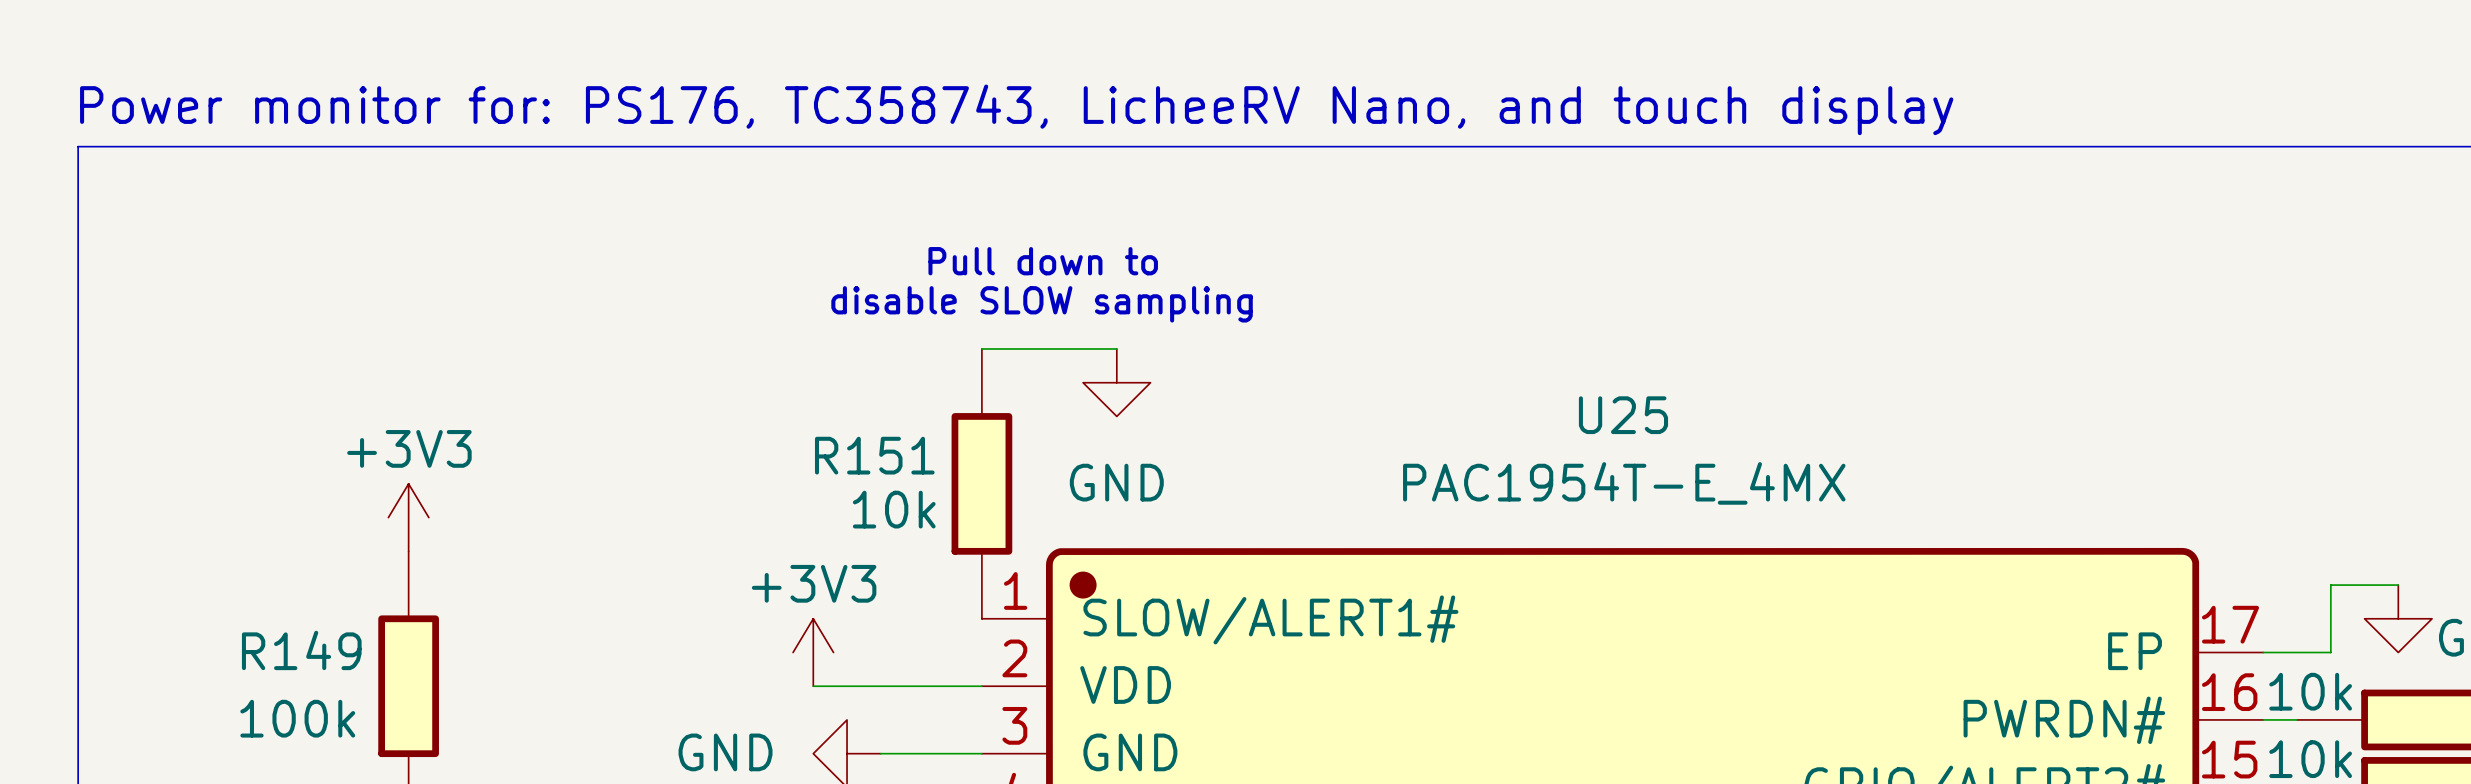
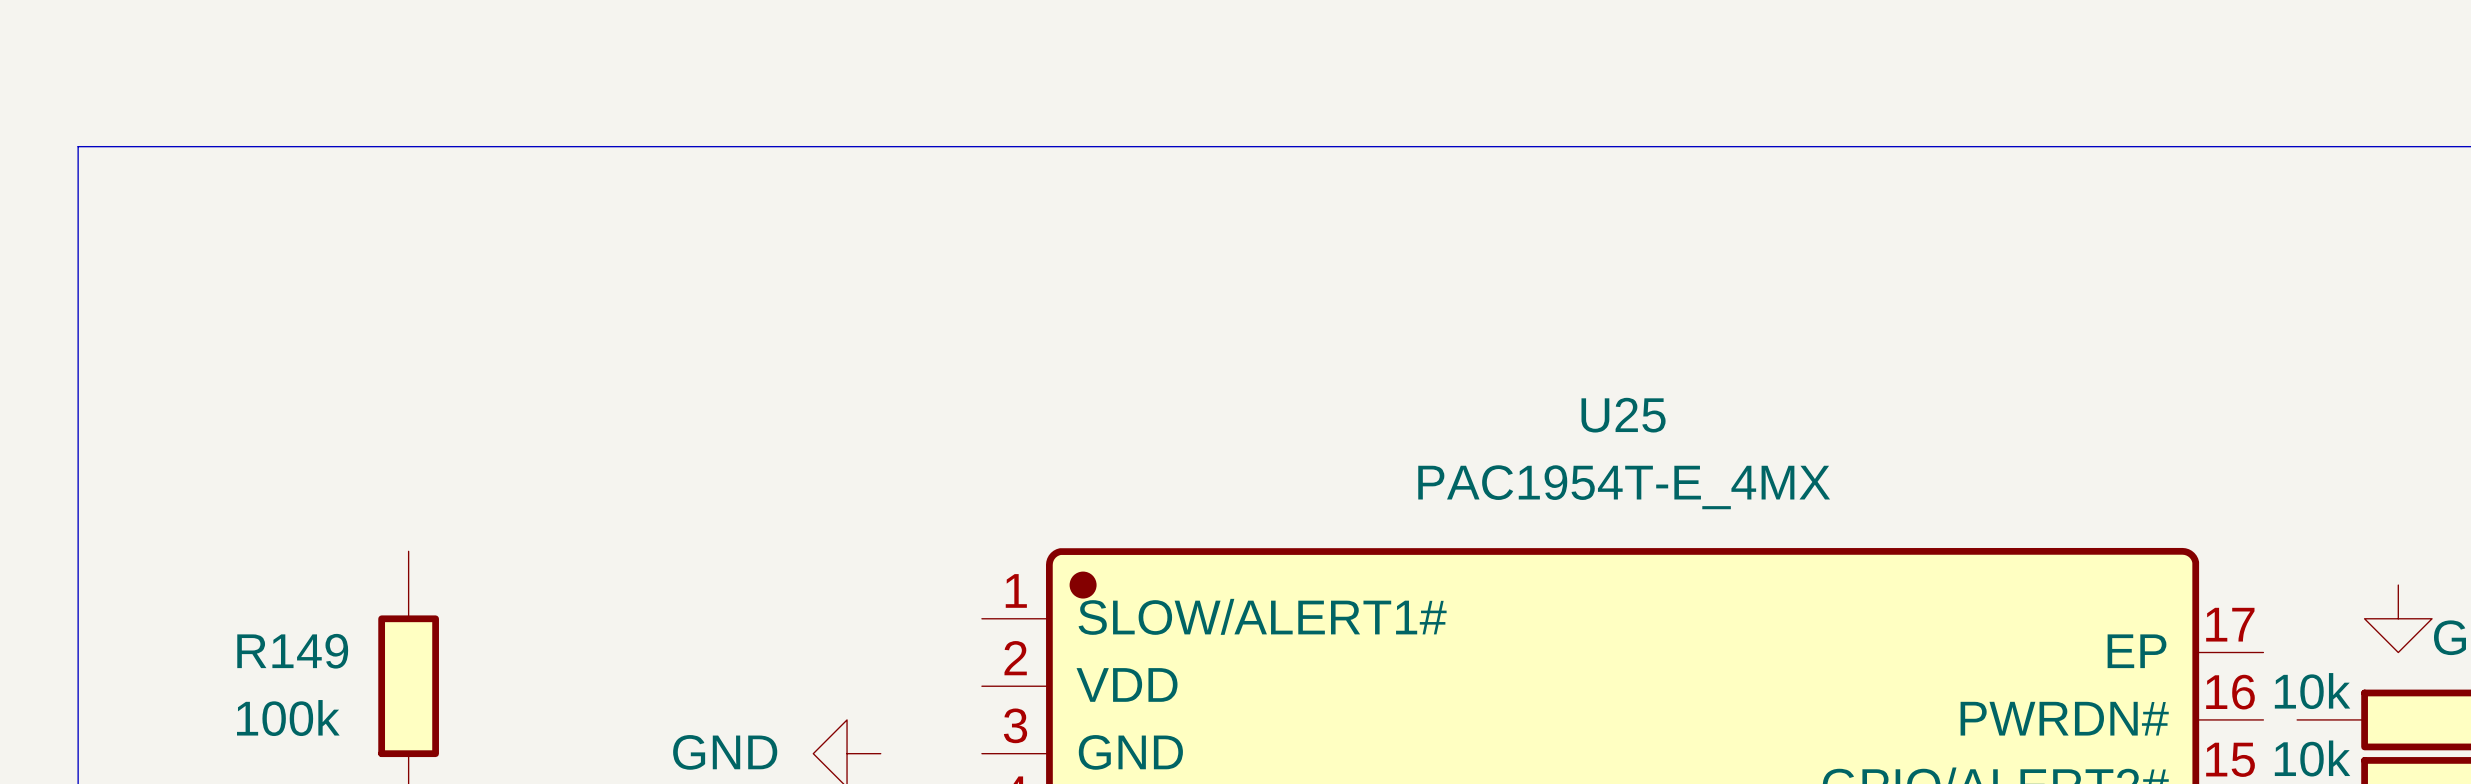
text: Power monitor for: PS176, TC358743, LicheeRV Nano, and touch display (1016, 109) -> none
text: Pull down to (1043, 261) -> none
text: disable SLOW sampling (1042, 304) -> none
wire: (981, 348) (1116, 348) -> none
power symbol: GND (1116, 382) -> none
R151: 10k (981, 483) -> none
power symbol: +3V3 (408, 517) -> none
wire: (2398, 585) (2330, 585) (2330, 652) (2263, 652) -> none
power symbol: +3V3 (813, 652) -> none
wire: (813, 686) (981, 686) -> none
wire: (2263, 719) (2297, 719) -> none
wire: (880, 753) (981, 753) -> none

